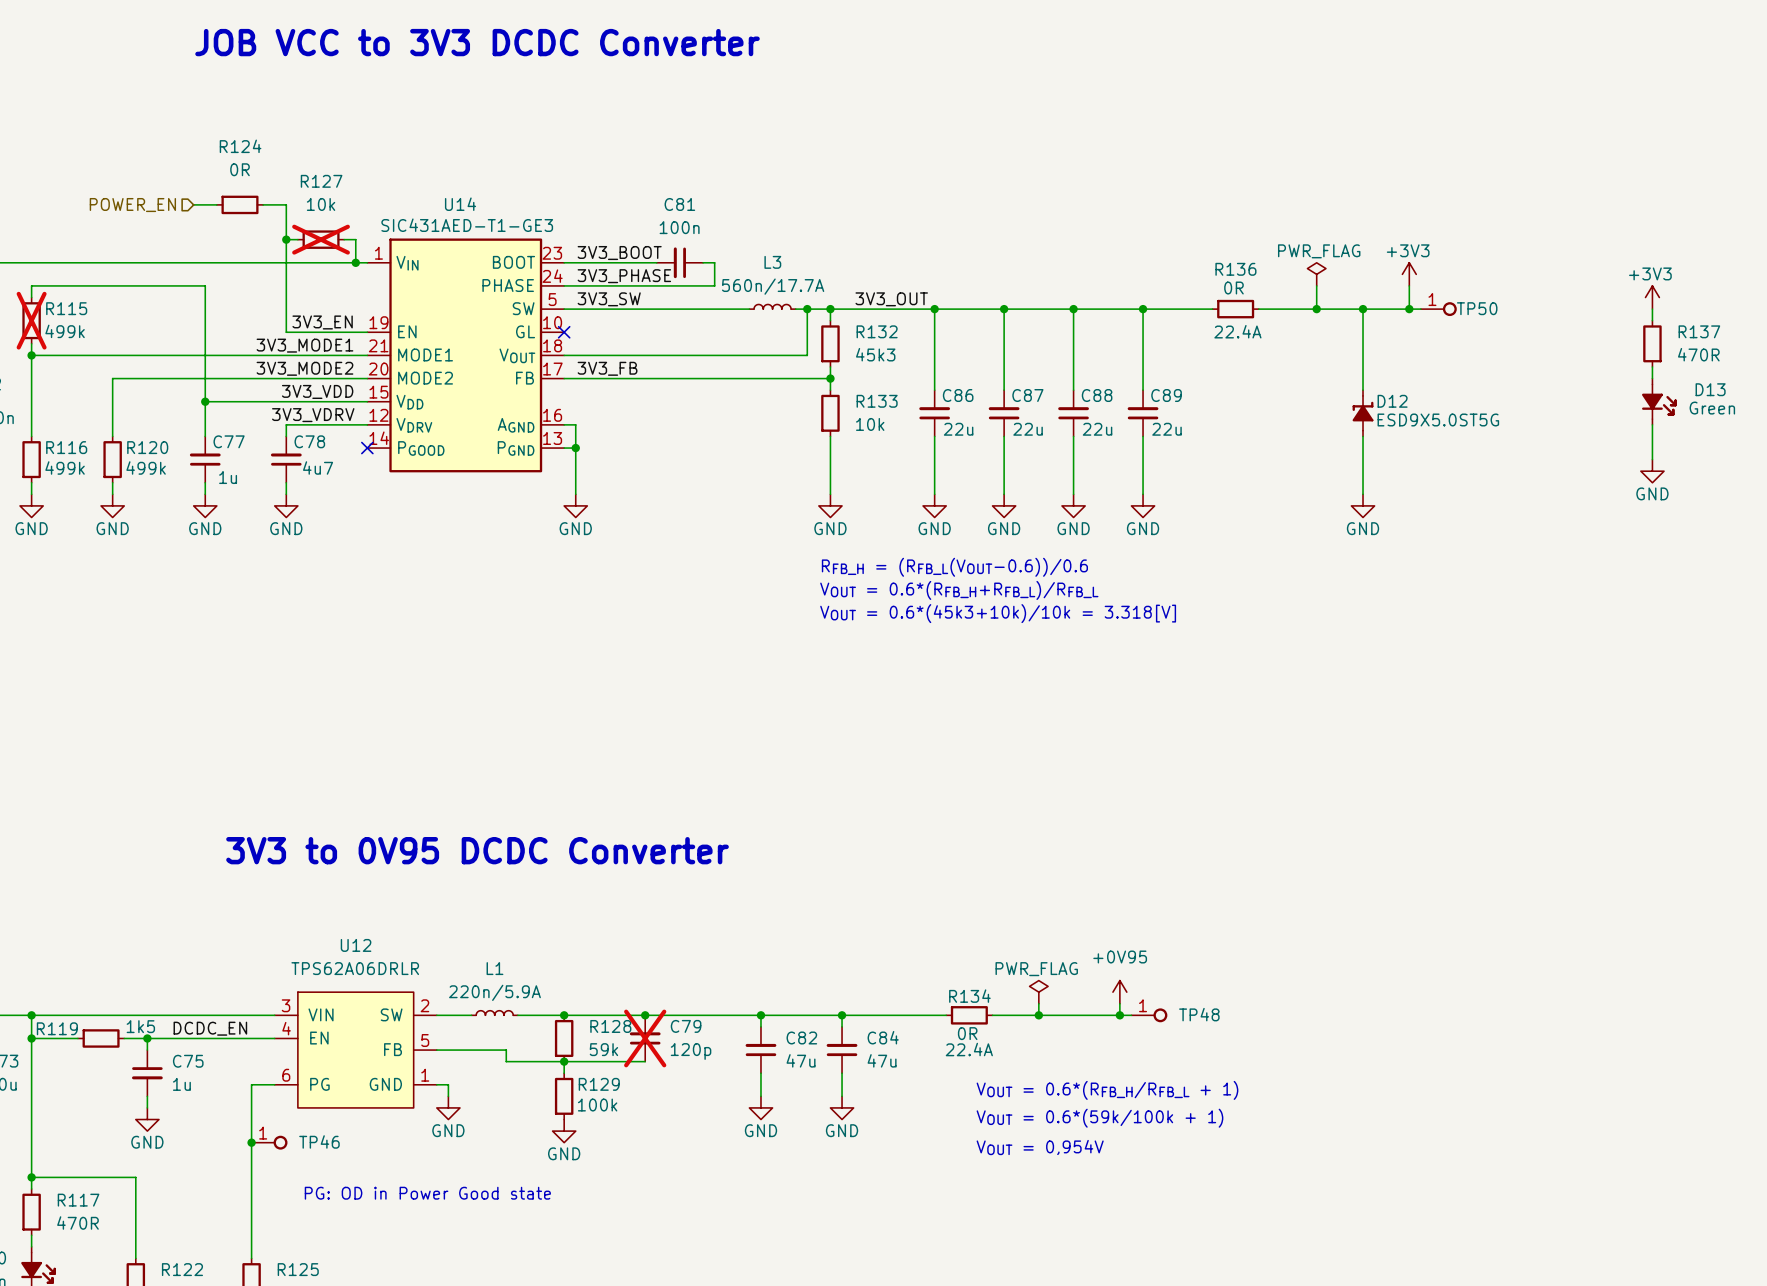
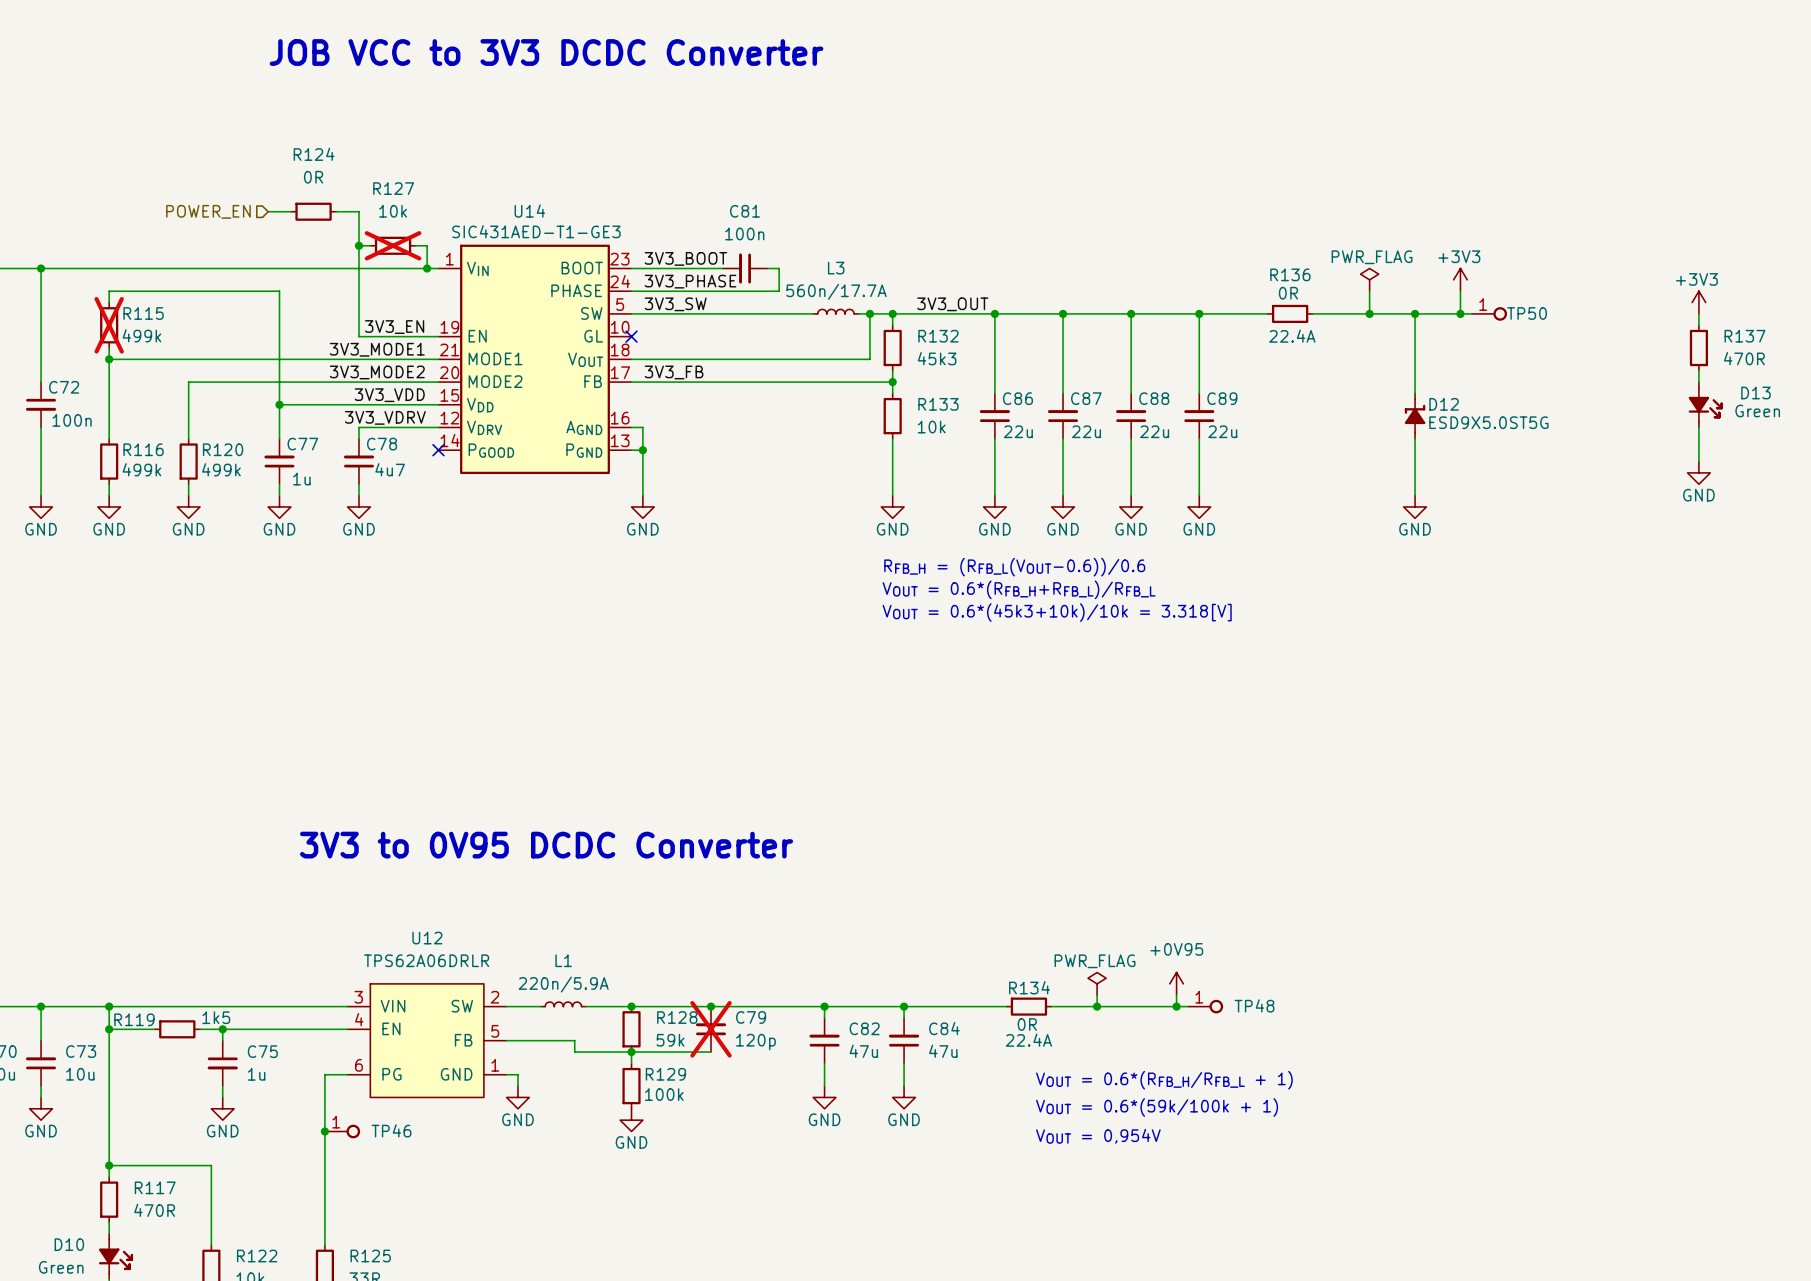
label: DCDC_EN (210, 1028) -> none
text: PG: OD in Power Good state (427, 1193) -> none

